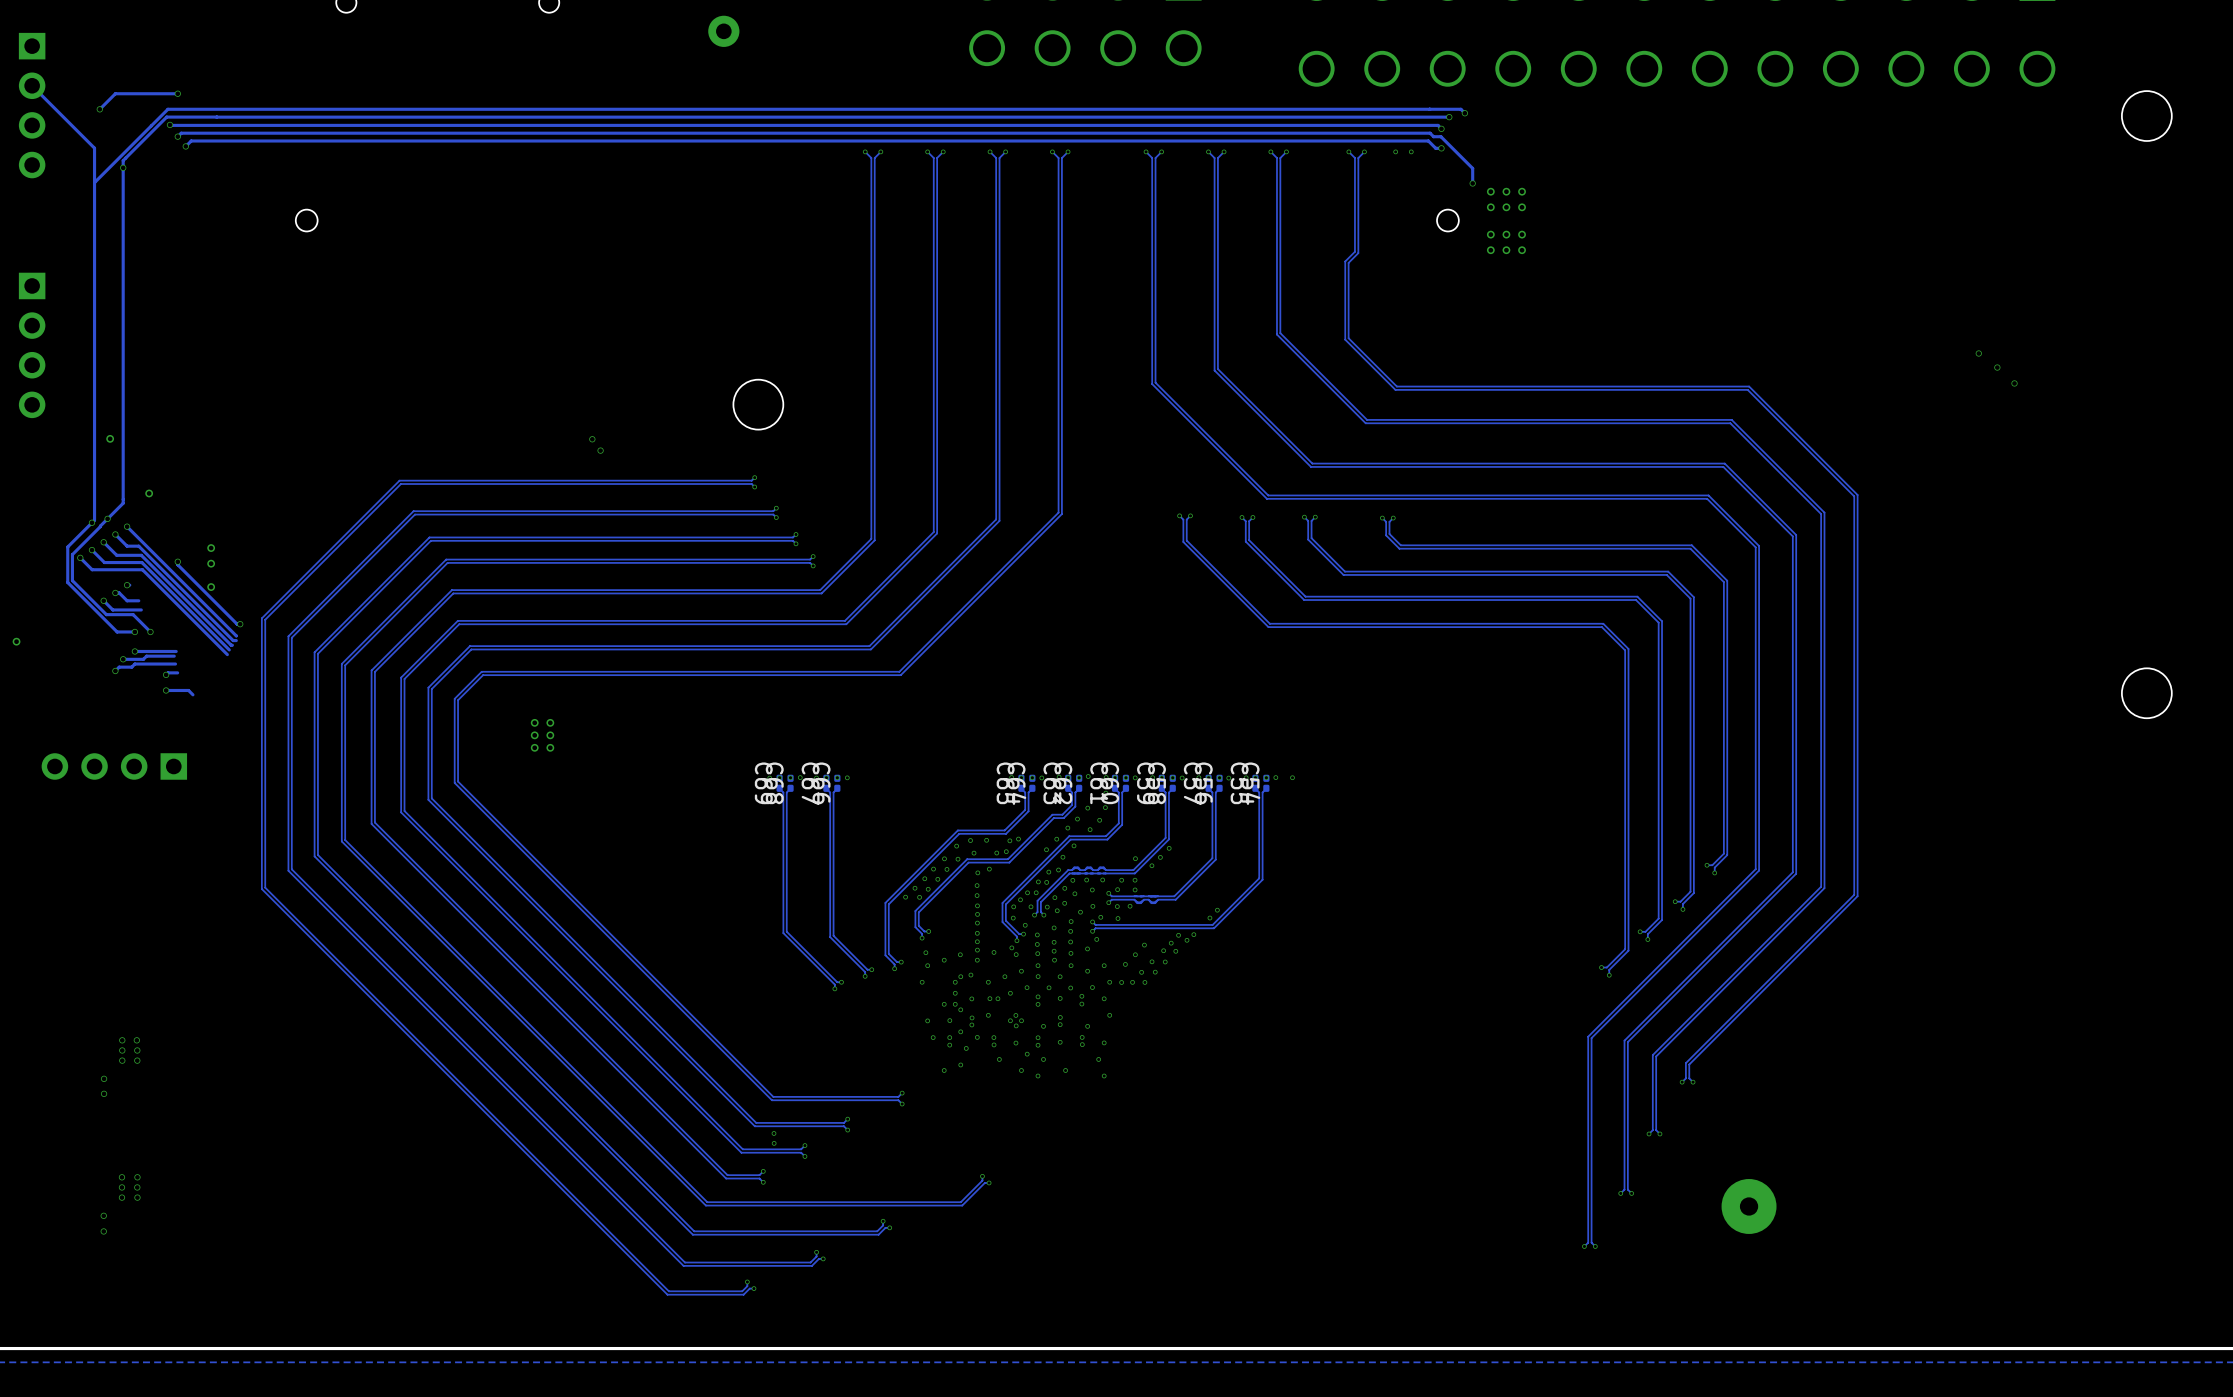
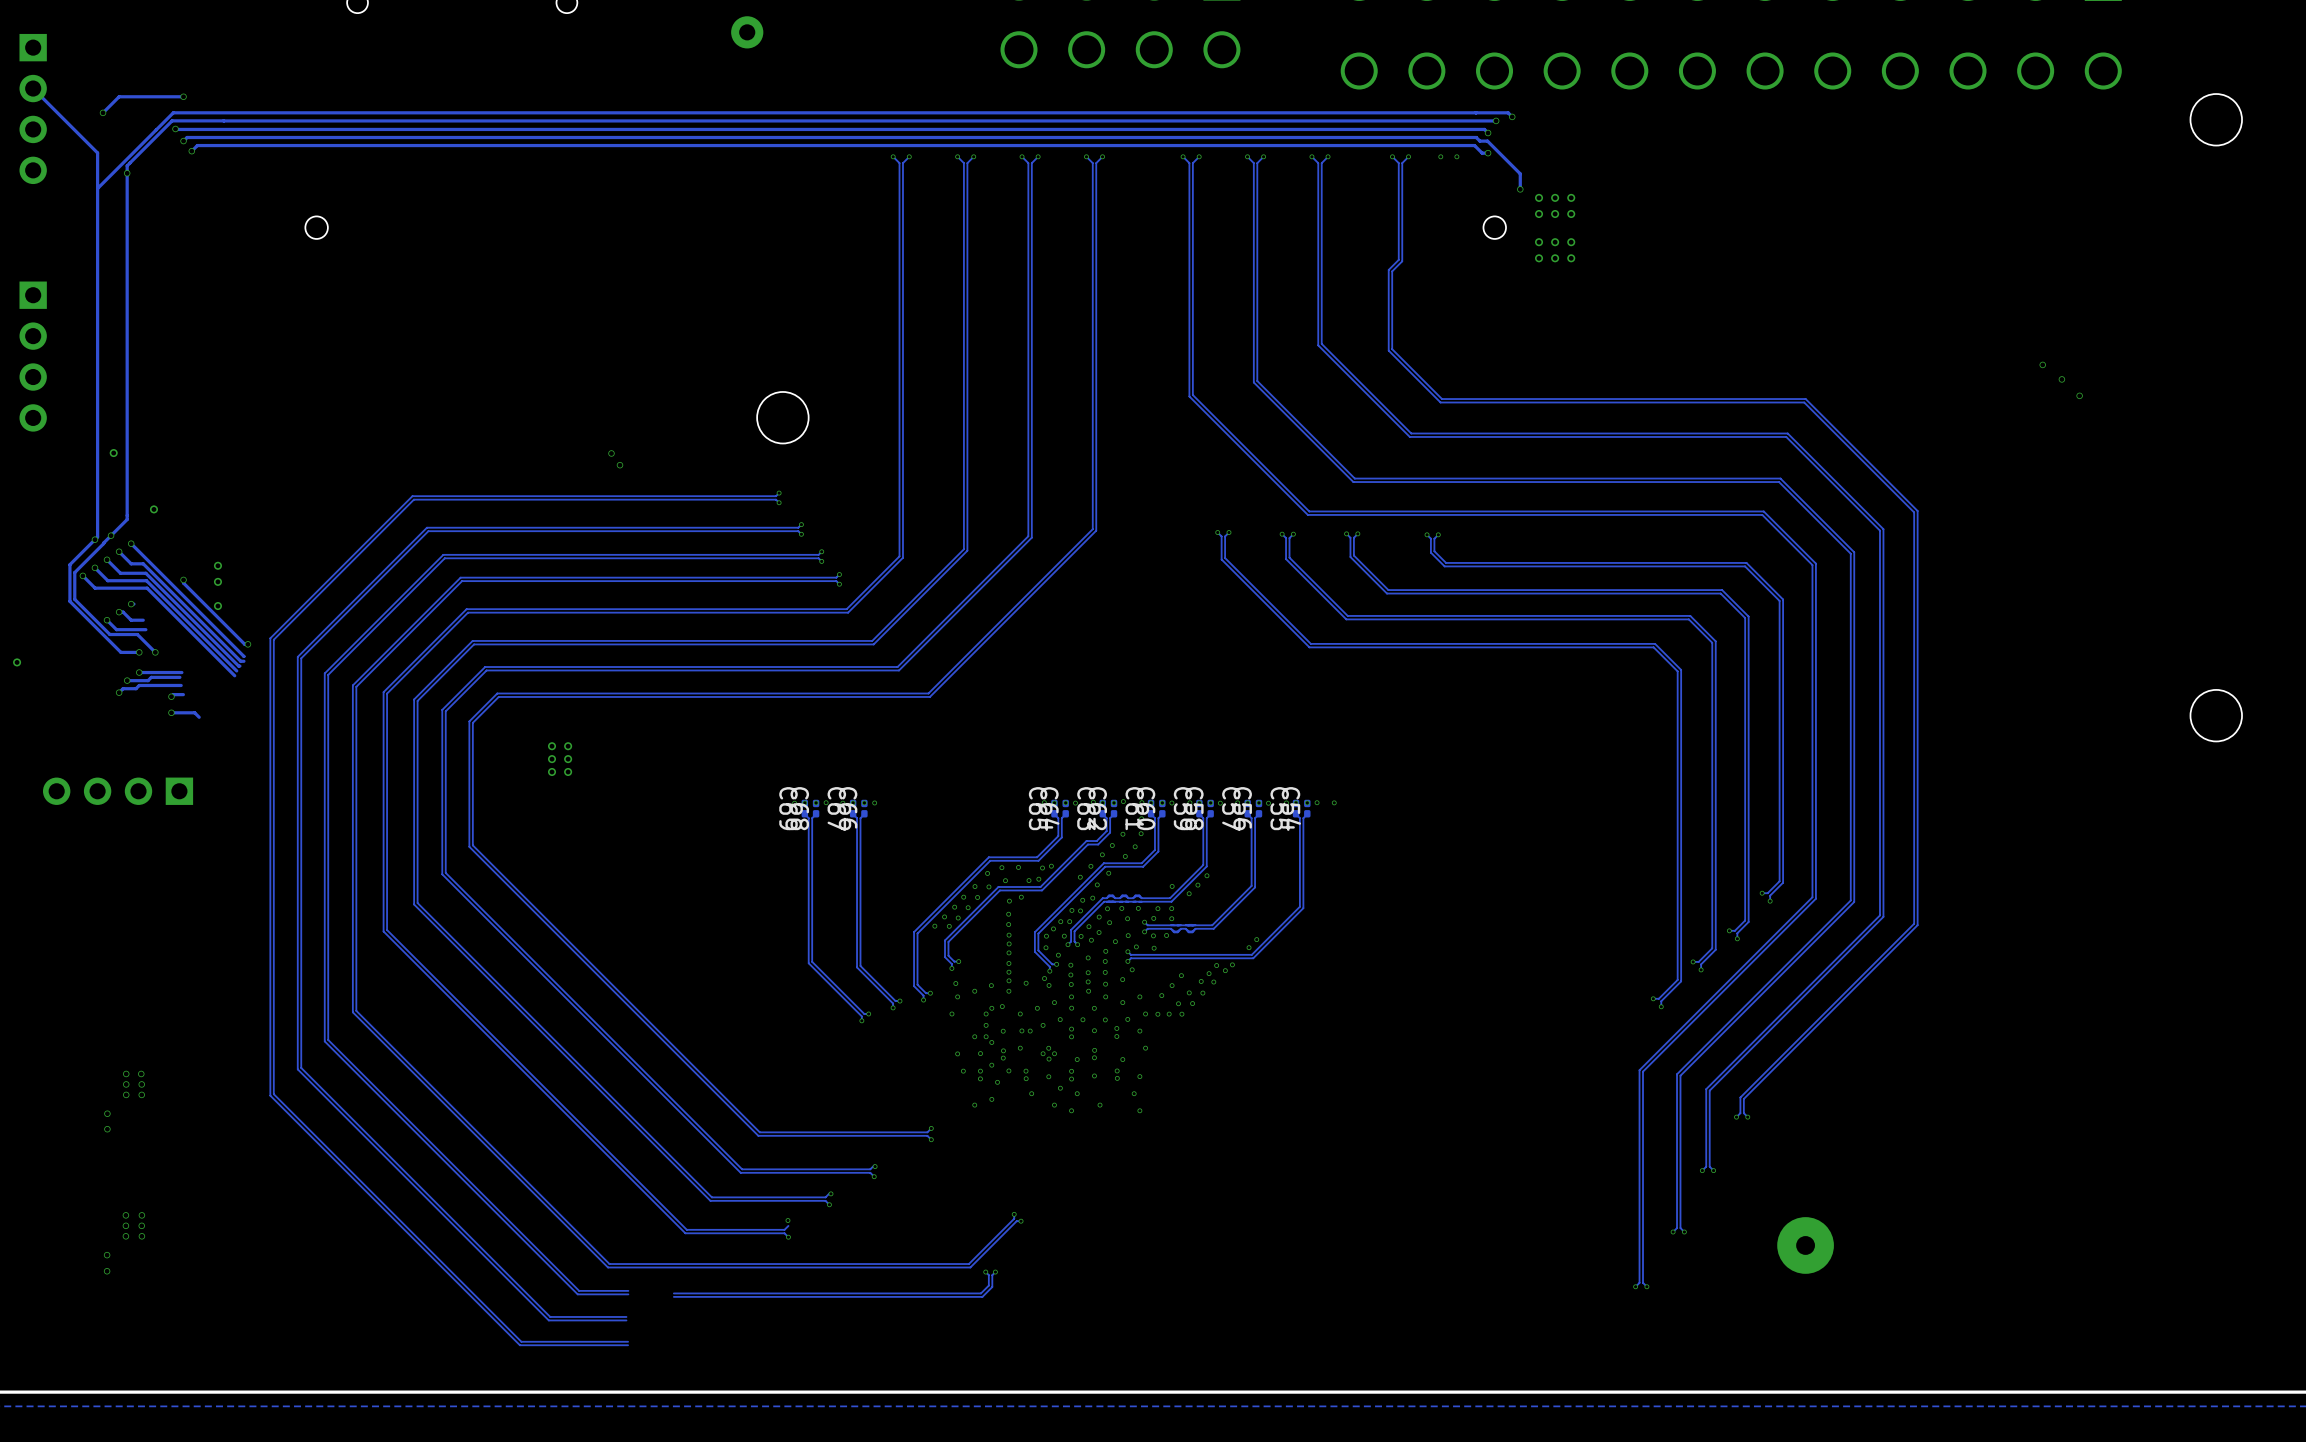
track: (458, 781) (773, 1096) -> (472, 806) (472, 845) (759, 1132) (798, 1132)
track: (454, 782) (771, 1100) -> (469, 808) (469, 846) (758, 1135) (796, 1135)
track: (431, 798) (756, 1122) (843, 1122) (847, 1119) -> (445, 824) (445, 872) (742, 1169) (870, 1169) (874, 1165)
track: (428, 799) (754, 1126) (843, 1126) (847, 1130) -> (442, 825) (442, 874) (740, 1172) (870, 1172) (874, 1176)
track: (404, 811) (742, 1149) (801, 1149) (804, 1145) -> (417, 837) (417, 903) (711, 1197) (825, 1197) (829, 1193)
track: (401, 812) (741, 1152) (801, 1152) (804, 1156) -> (414, 838) (414, 904) (710, 1200) (825, 1200) (829, 1204)
track: (374, 822) (727, 1175) (759, 1175) (763, 1171) -> (387, 849) (387, 930) (686, 1229) (784, 1229) (788, 1225)
track: (371, 823) (726, 1178) (759, 1178) (763, 1182) -> (383, 850) (383, 931) (685, 1233) (784, 1233) (788, 1237)
track: (345, 840) (707, 1202) (960, 1202) -> (356, 867) (356, 1010) (609, 1264) (968, 1264) (991, 1241)
track: (341, 841) (705, 1205) (962, 1205) -> (918, 1267) (970, 1267) (993, 1244)
track: (317, 855) (694, 1231) (877, 1231) (883, 1225) (883, 1221) -> (328, 882) (328, 1039) (579, 1290) (628, 1290)
track: (314, 856) (692, 1234) (878, 1234) (885, 1227) -> (352, 868) (352, 1012) (608, 1267) (914, 1267)
track: none -> (324, 884) (324, 1041) (577, 1294) (628, 1294)
track: (291, 869) (684, 1262) (810, 1262) (816, 1256) (816, 1252) -> (301, 897) (301, 1067) (550, 1316) (626, 1316)
track: (288, 870) (683, 1265) (811, 1265) (818, 1258) (823, 1258) -> (297, 898) (297, 1069) (548, 1320) (626, 1320)
track: (265, 887) (668, 1291) (742, 1291) (747, 1286) (747, 1281) -> (273, 916) (273, 1094) (521, 1341) (628, 1341)
track: (261, 889) (667, 1294) (743, 1294) (749, 1288) (753, 1288) -> (270, 917) (270, 1095) (519, 1345) (628, 1345)
via position: (847, 1119) -> (874, 1176)
via: (773, 1133) -> none
via: (774, 1143) -> none
via: (804, 1145) -> none
via: none -> (829, 1204)
via: (763, 1171) -> none
via: none -> (788, 1237)
via: (883, 1221) -> none
via: (889, 1227) -> none
track: none -> (985, 1272) (988, 1275) (988, 1285) (981, 1293) (673, 1293)
via: none -> (985, 1272)
track: none -> (995, 1272) (992, 1275) (992, 1287) (982, 1296) (673, 1296)
via: none -> (995, 1272)
via: (816, 1252) -> none
via: (823, 1258) -> none
via: (747, 1281) -> none
via: (753, 1288) -> none

